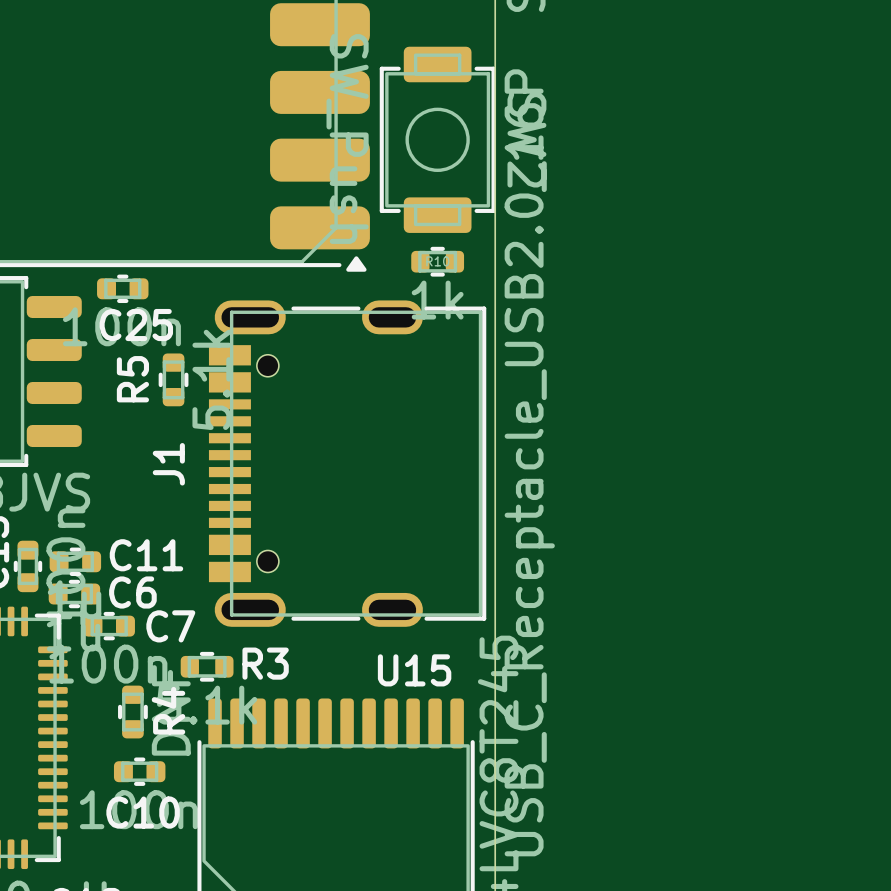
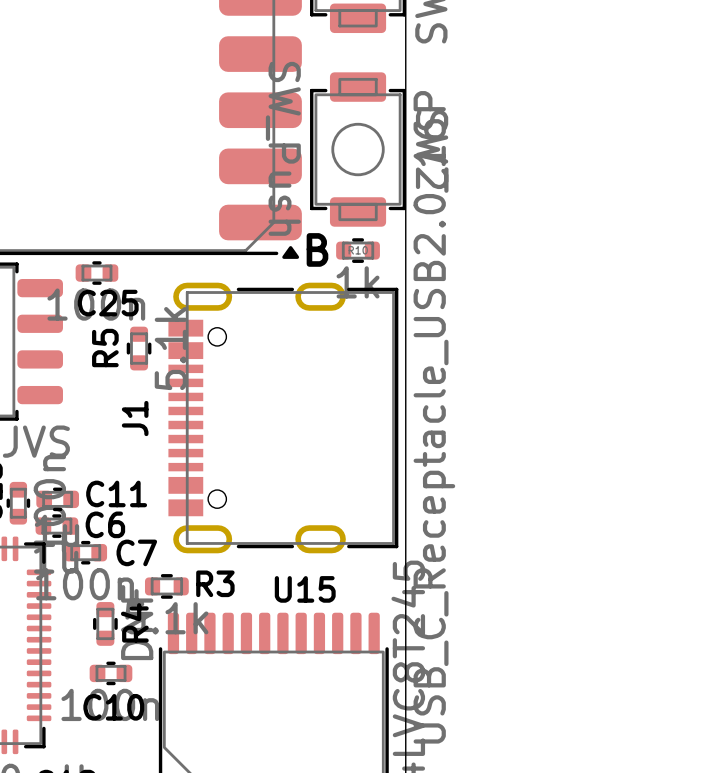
text: none -> B (317, 249)
U15 name position: U15 (414, 670) -> U15 (305, 589)

